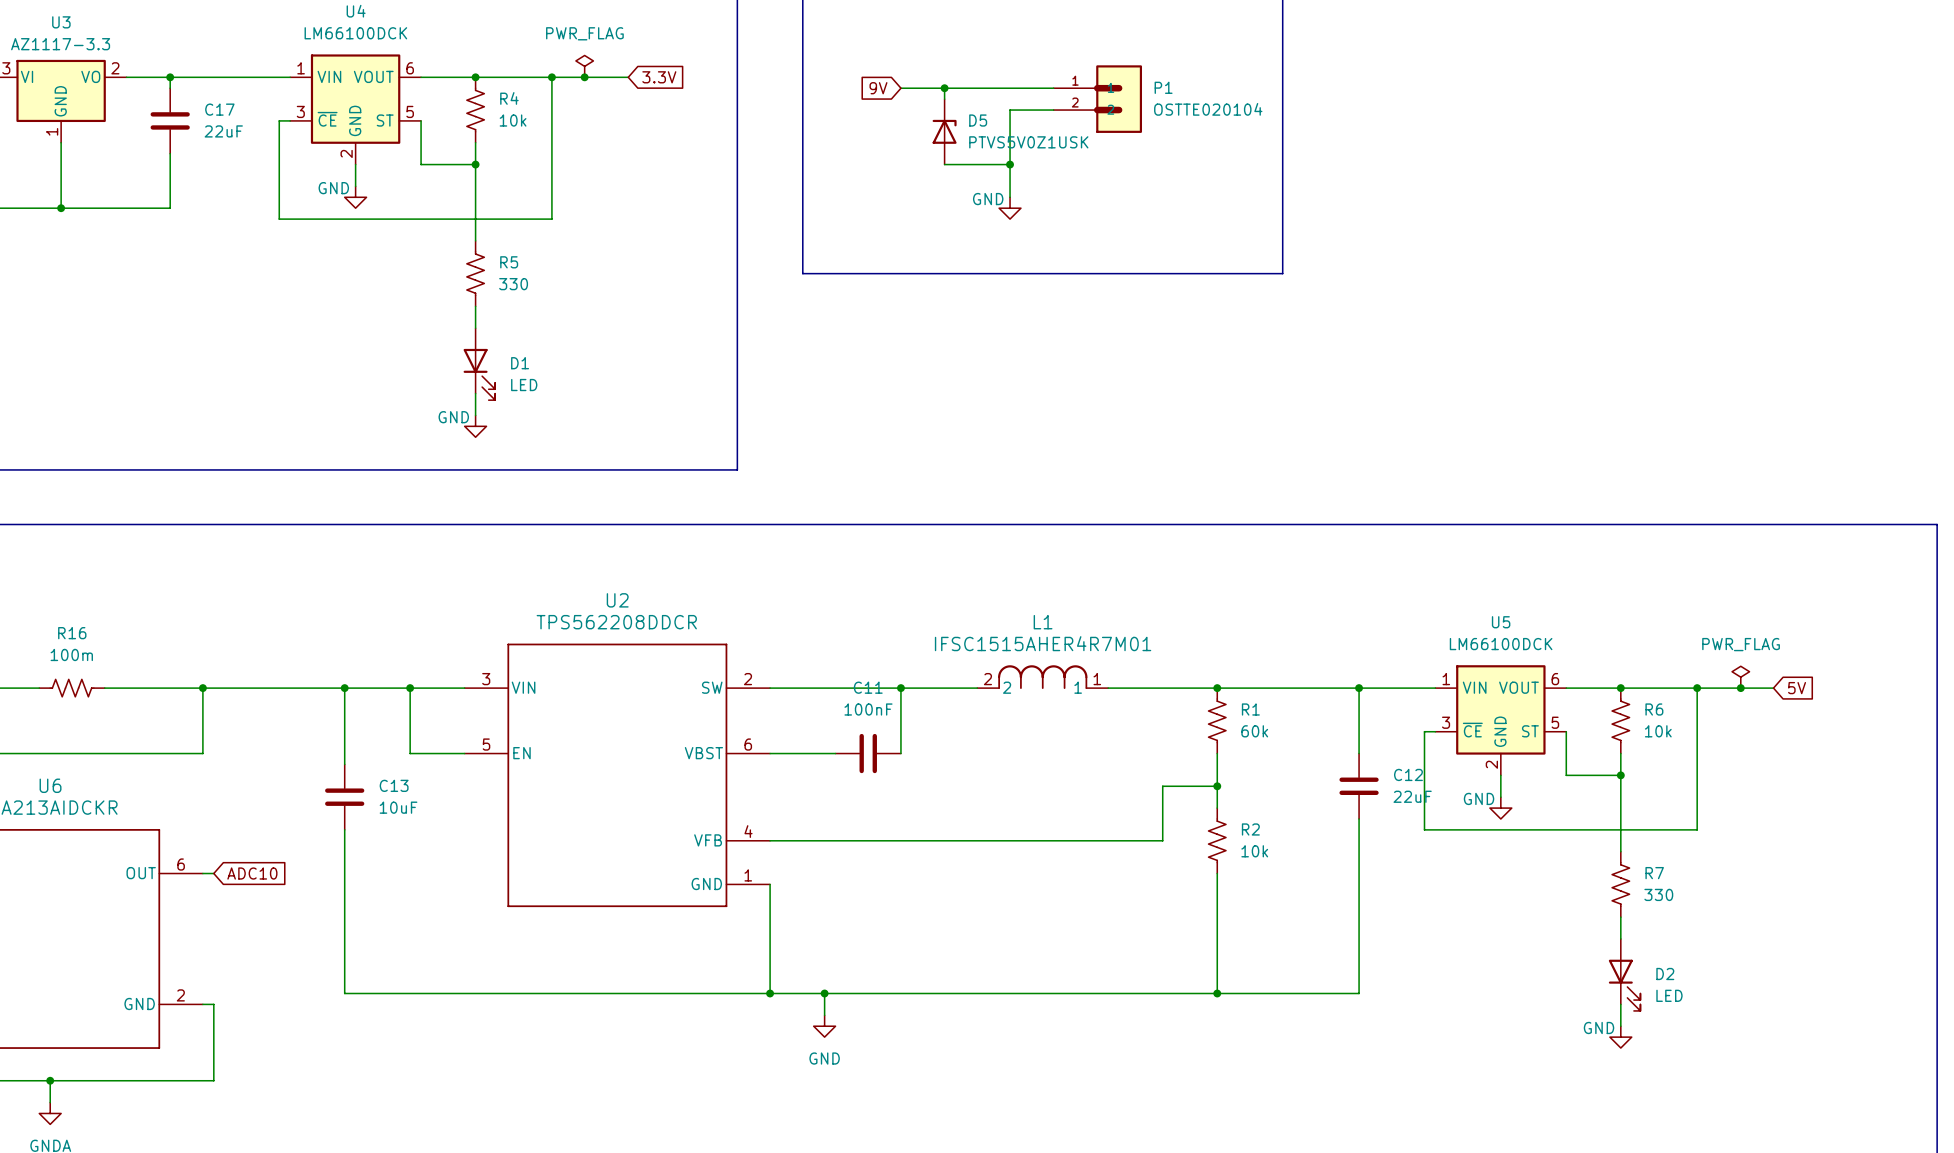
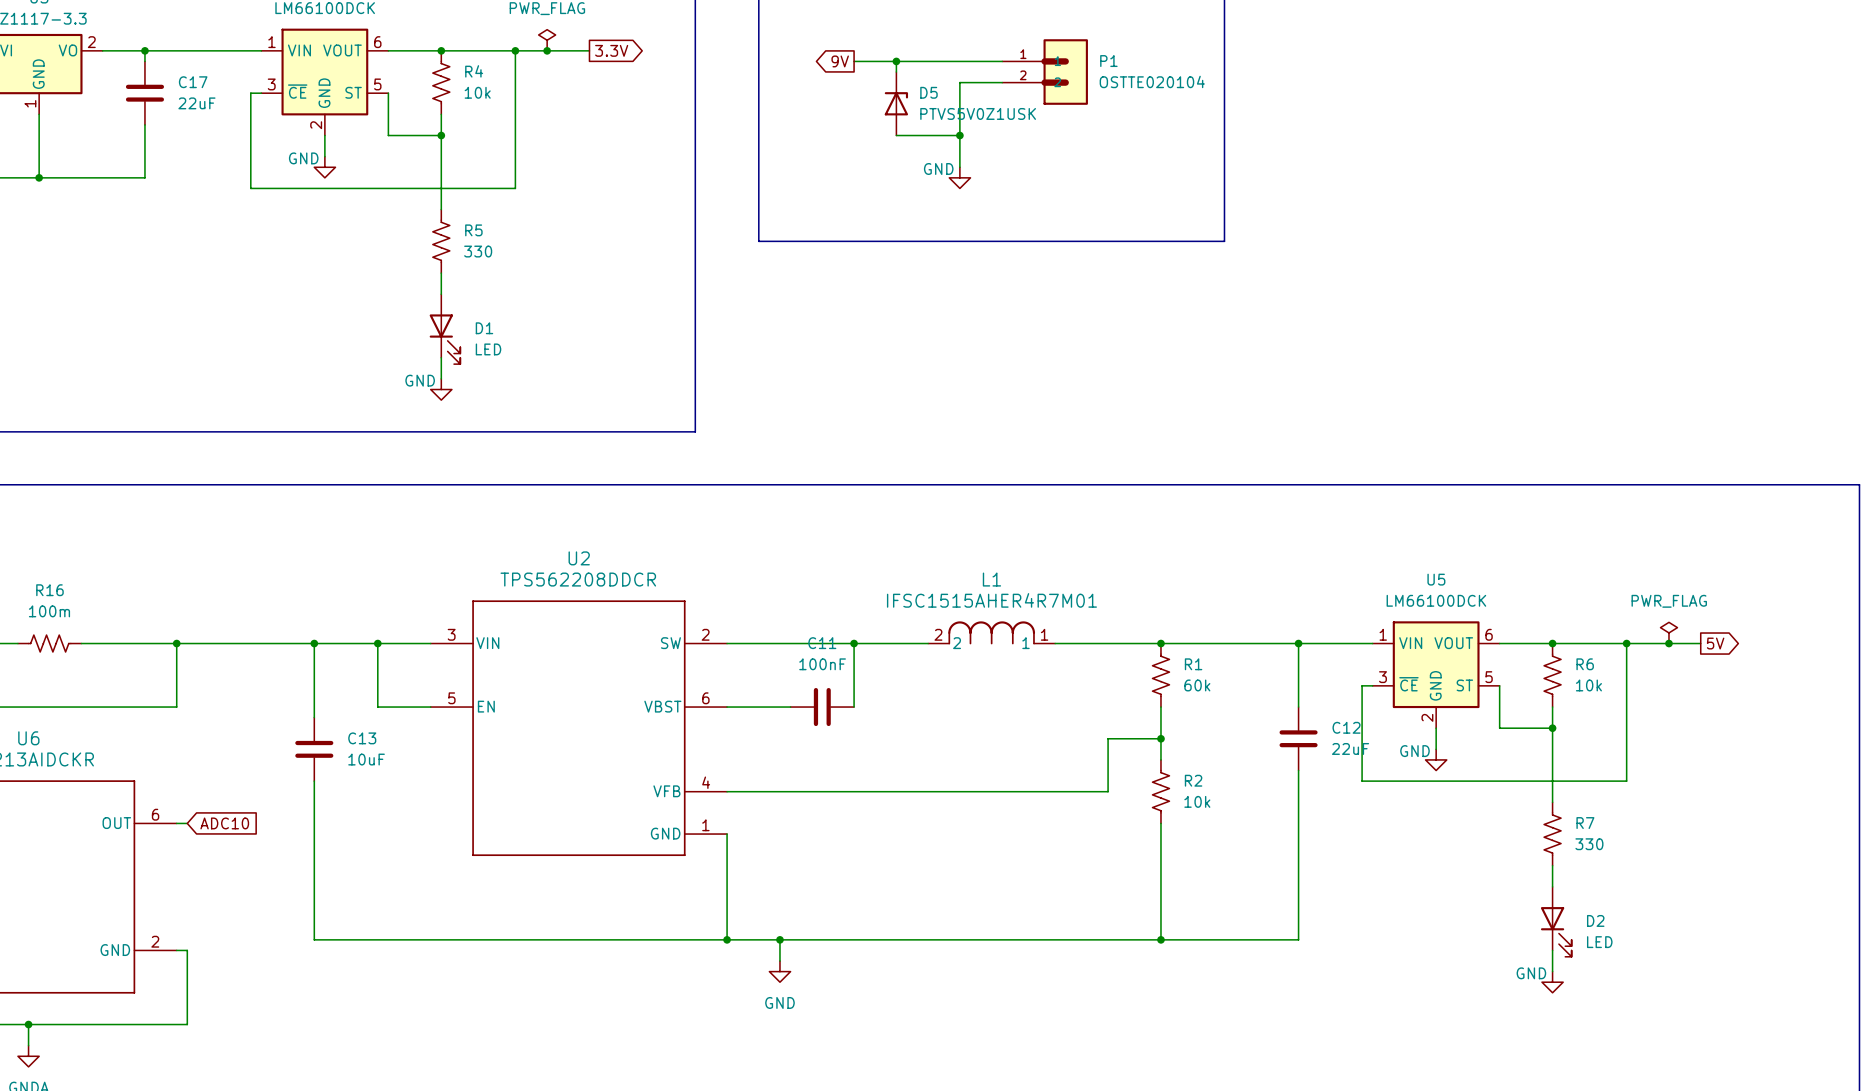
global label shape: input (659, 77) -> output (611, 50)
global label shape: input (878, 88) -> output (840, 61)
global label shape: input (1797, 688) -> output (1715, 643)

